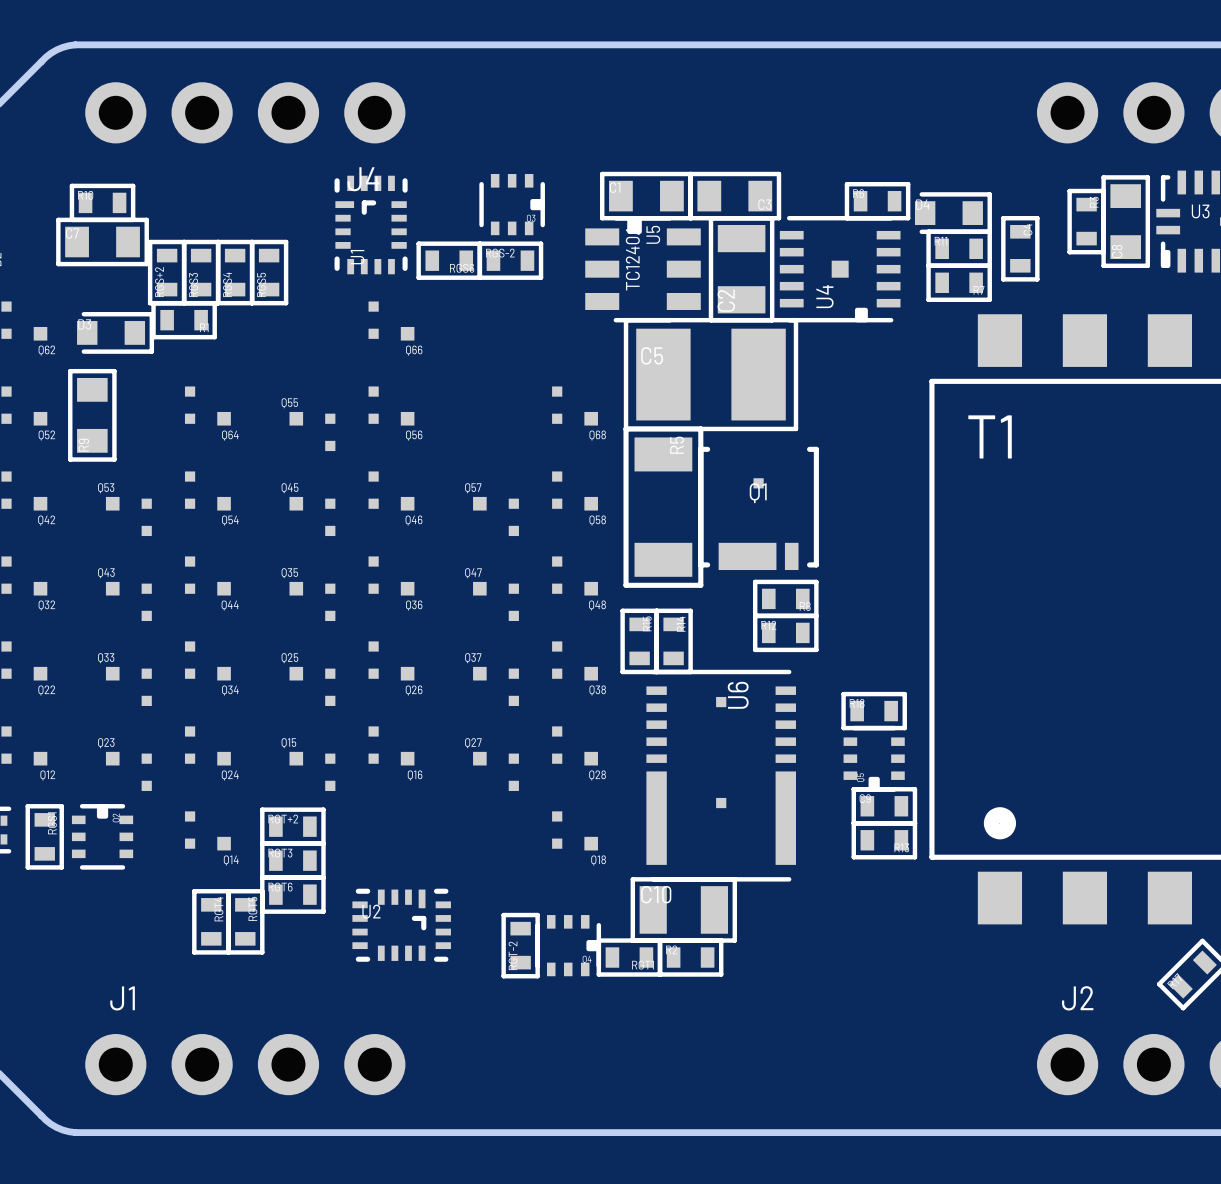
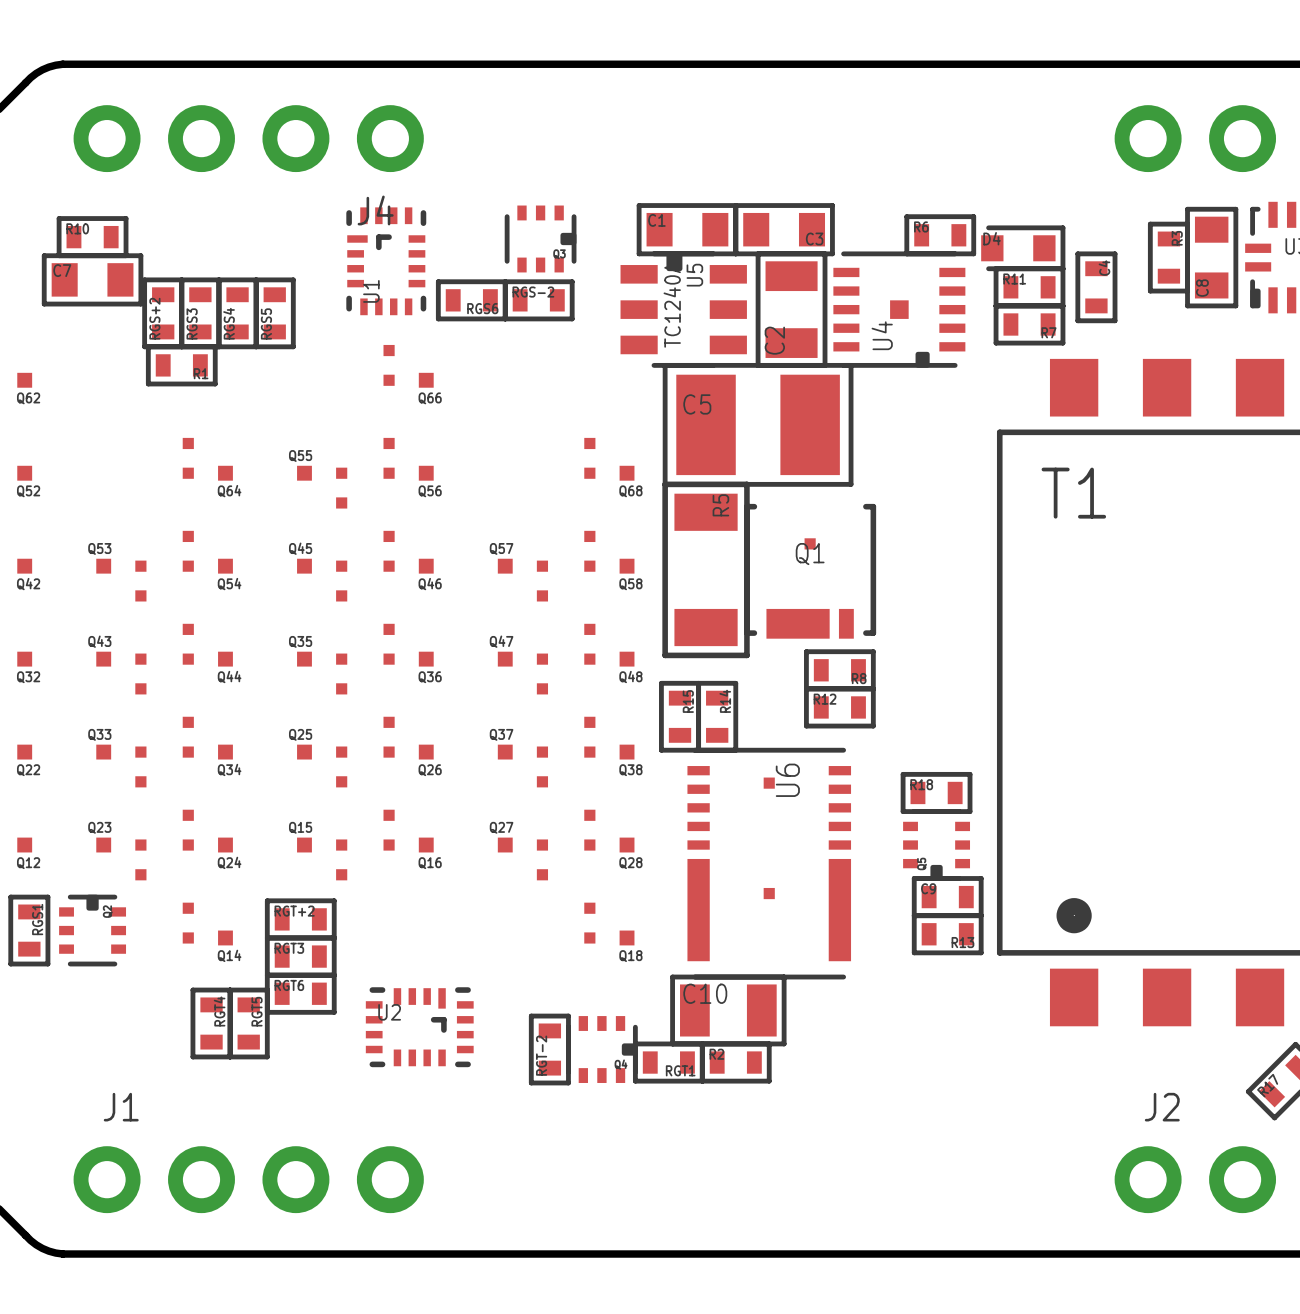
part: (115, 332) -> none
part: (92, 415) -> none

